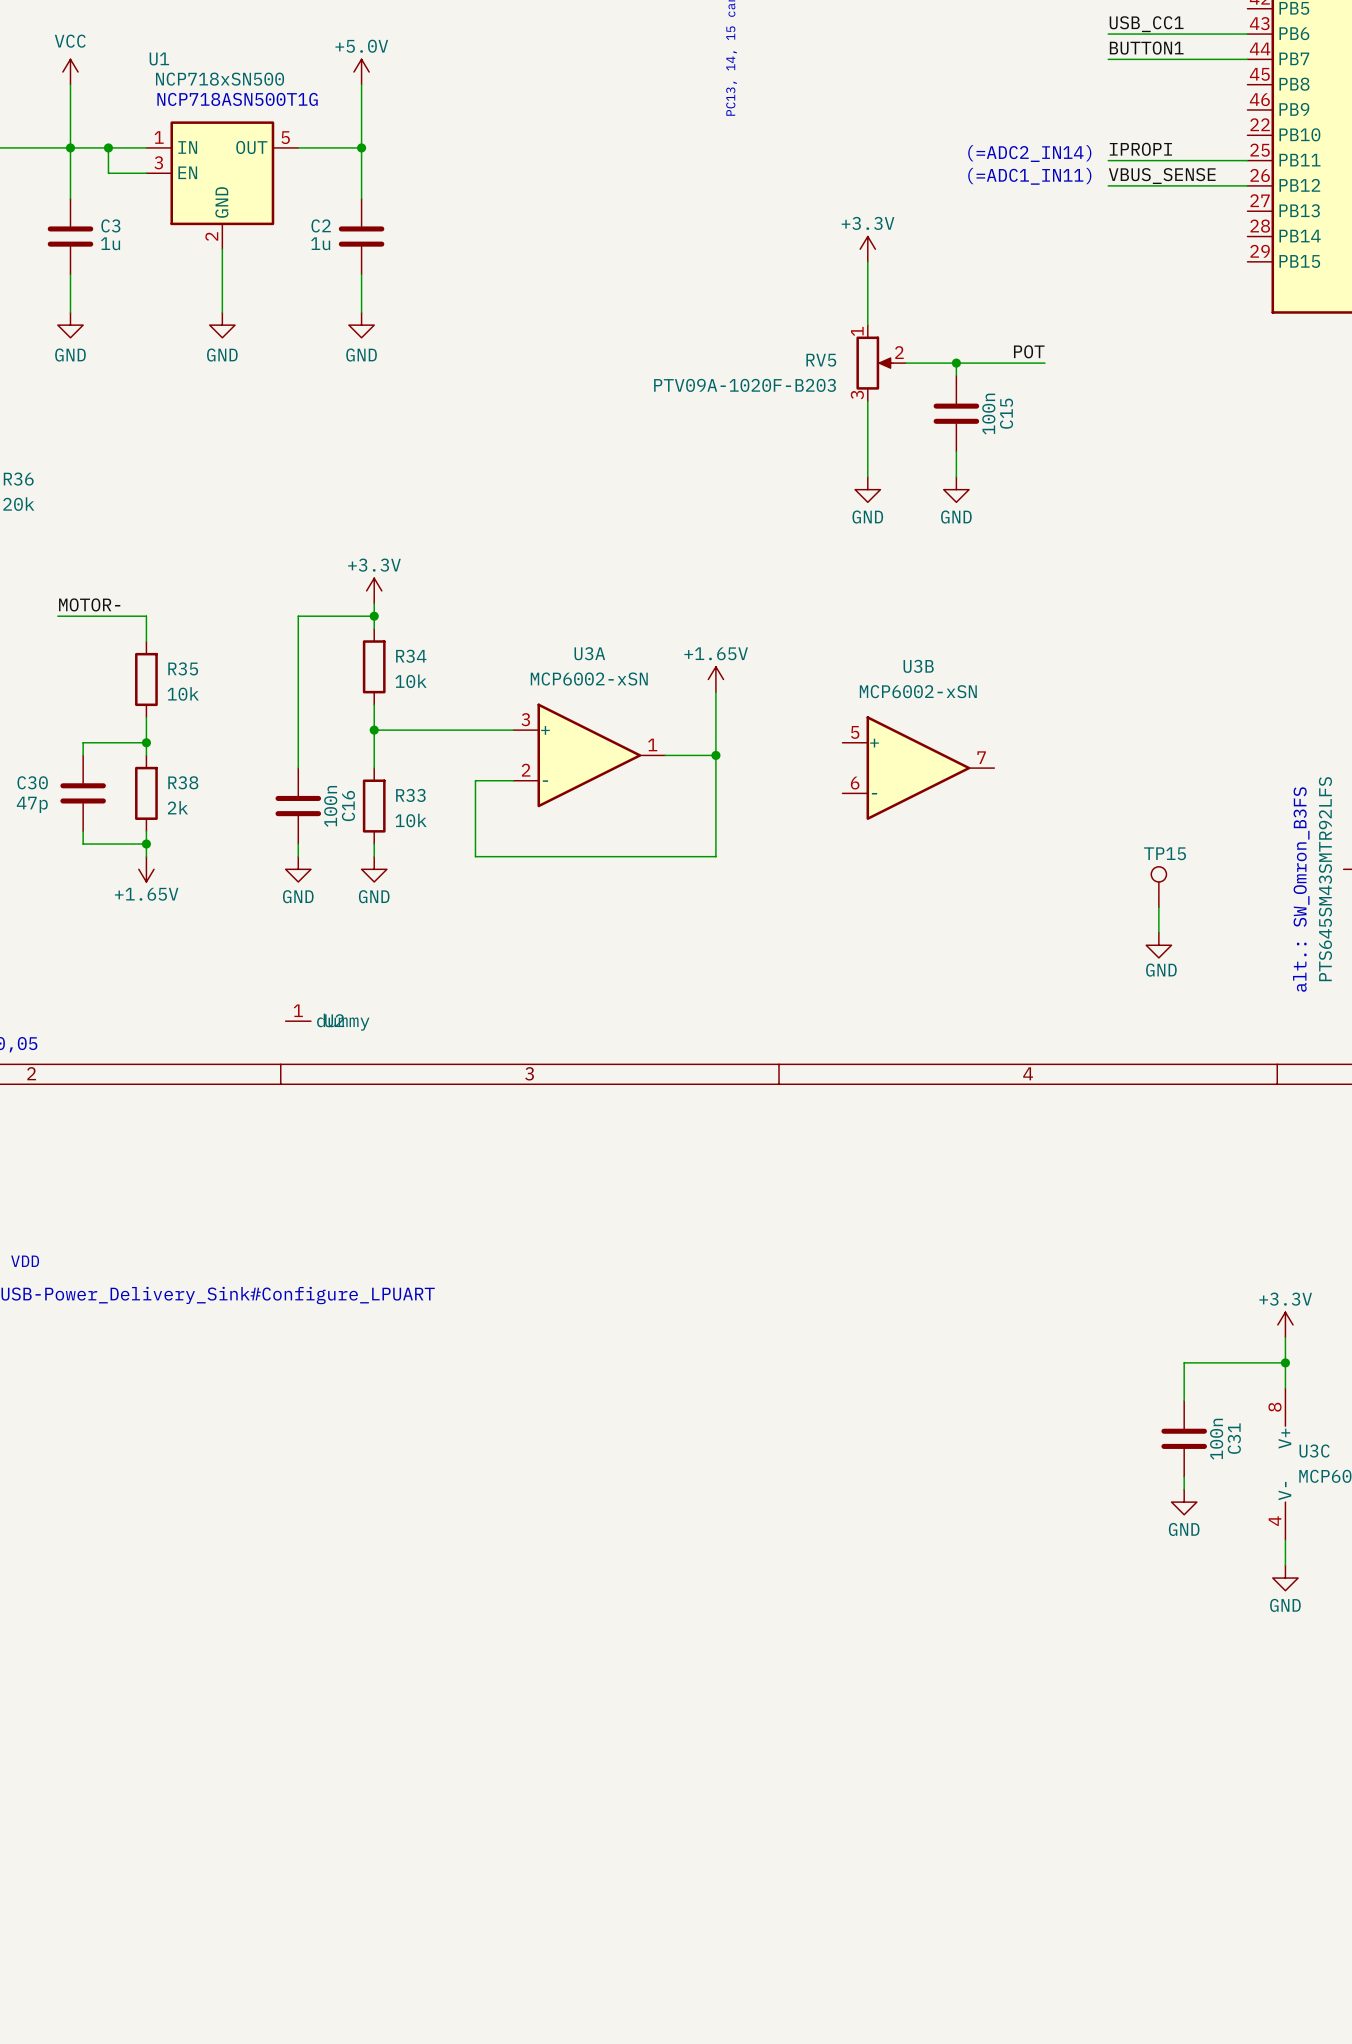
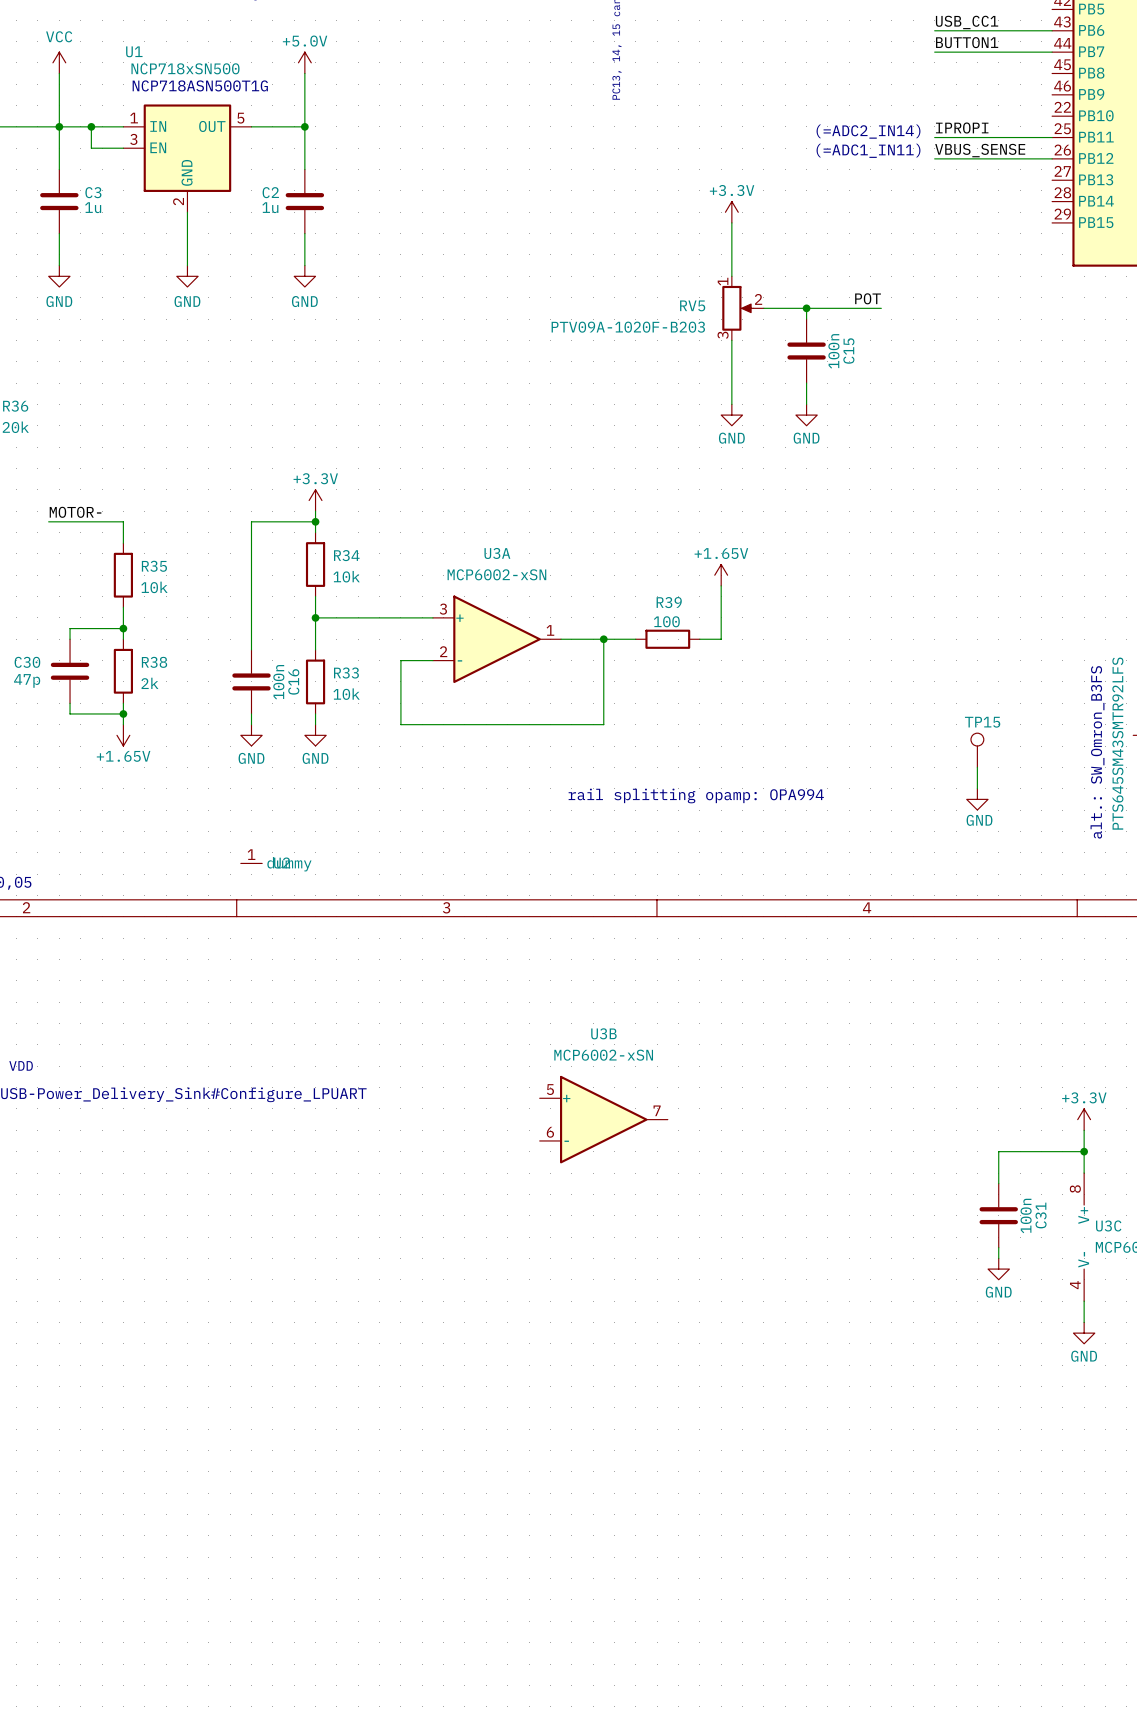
power symbol position: +1.65V (715, 679) -> +1.65V (721, 575)
wire: (715, 692) (715, 755) -> (635, 639) (603, 639)
wire: none -> (721, 585) (721, 639) (699, 639)
R39: none -> 100 (667, 639)
U3B position: (918, 768) -> (603, 1119)
text: none -> rail splitting opamp: OPA994 (696, 795)

